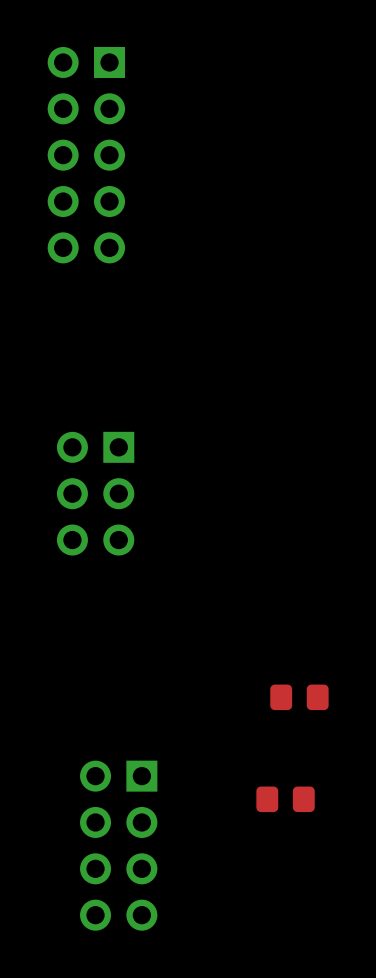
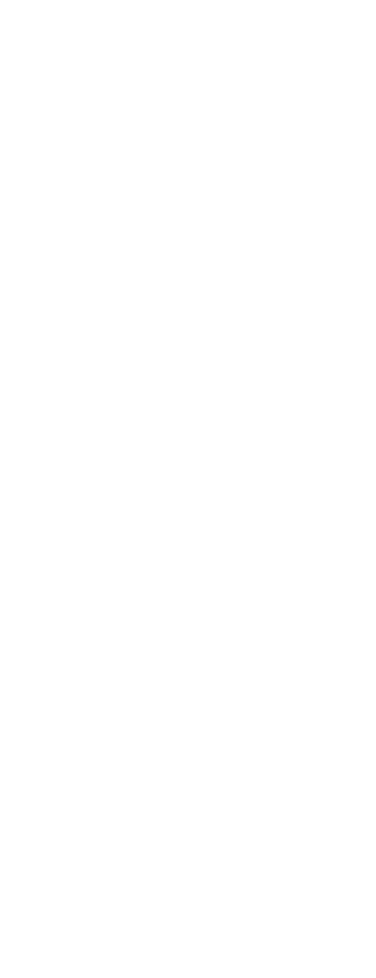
part: (86, 155) -> none
part: (95, 493) -> none
part: (299, 697) -> none
part: (285, 799) -> none
part: (118, 845) -> none

